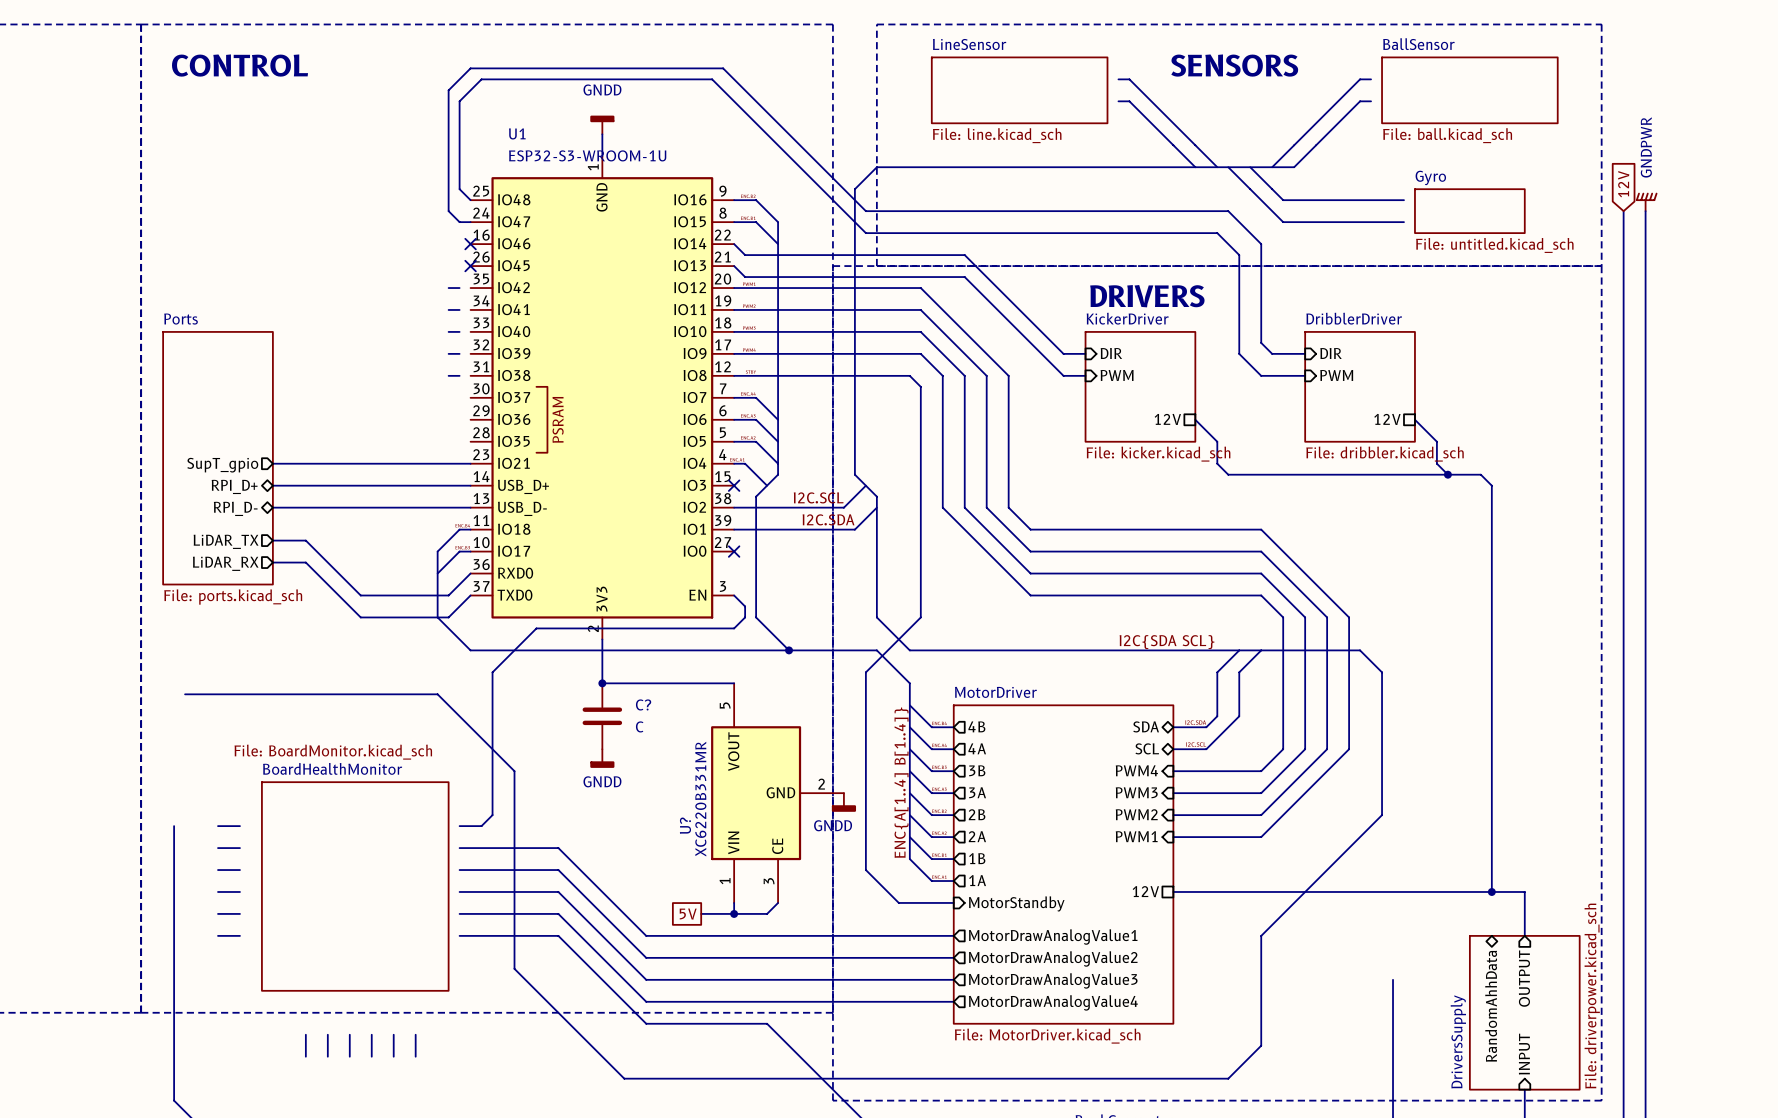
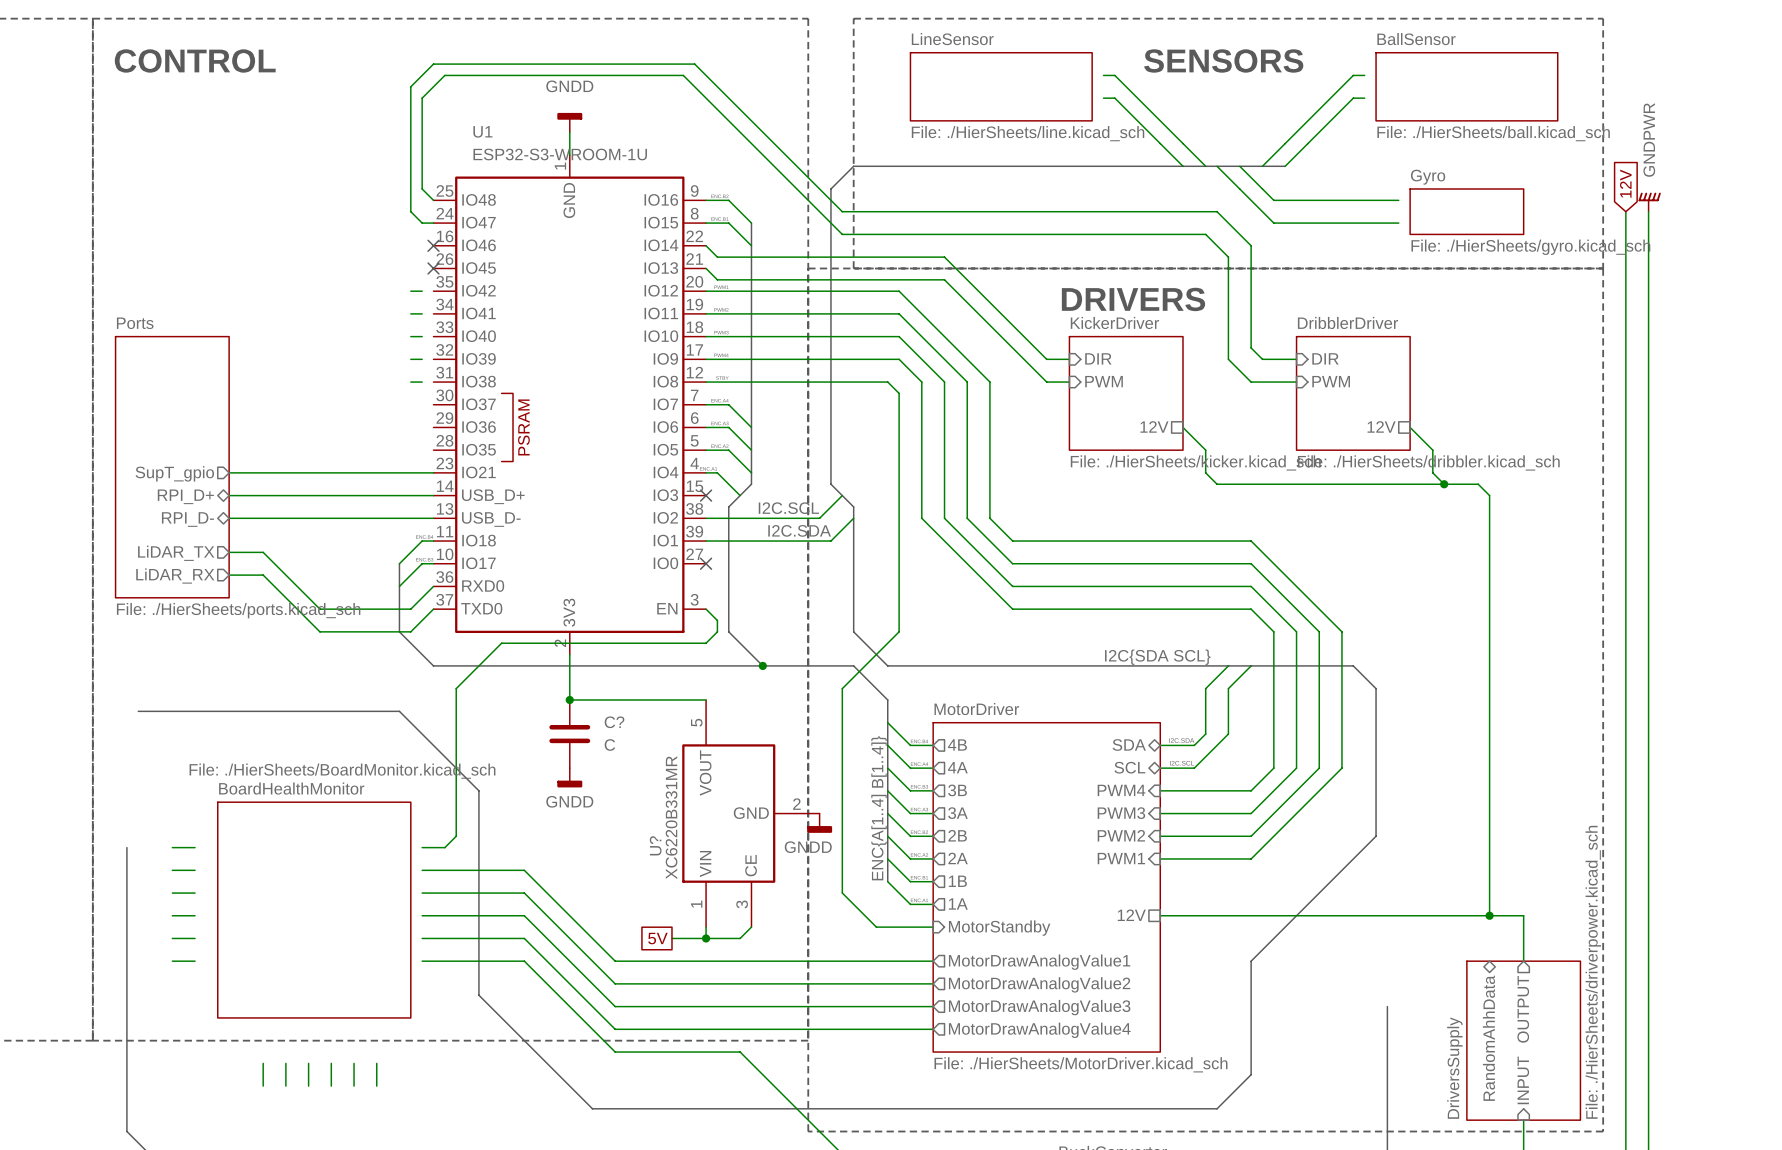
sheet LineSensor value: File: line.kicad_sch (997, 135) -> File: ./HierSheets/line.kicad_sch (1028, 133)
sheet BallSensor value: File: ball.kicad_sch (1447, 135) -> File: ./HierSheets/ball.kicad_sch (1493, 133)
sheet Gyro value: File: untitled.kicad_sch (1494, 245) -> File: ./HierSheets/gyro.kicad_sch (1530, 247)
sheet KickerDriver value: File: kicker.kicad_sch (1158, 454) -> File: ./HierSheets/kicker.kicad_sch (1195, 462)
sheet DribblerDriver value: File: dribbler.kicad_sch (1385, 454) -> File: ./HierSheets/dribbler.kicad_sch (1428, 462)
sheet Ports value: File: ports.kicad_sch (233, 597) -> File: ./HierSheets/ports.kicad_sch (238, 610)
sheet BoardHealthMonitor value: File: BoardMonitor.kicad_sch (333, 752) -> File: ./HierSheets/BoardMonitor.kicad_sch (342, 771)
sheet DriversSupply value: File: driverpower.kicad_sch (1592, 996) -> File: ./HierSheets/driverpower.kicad_sch (1593, 972)
sheet MotorDriver value: File: MotorDriver.kicad_sch (1047, 1036) -> File: ./HierSheets/MotorDriver.kicad_sch (1080, 1064)

